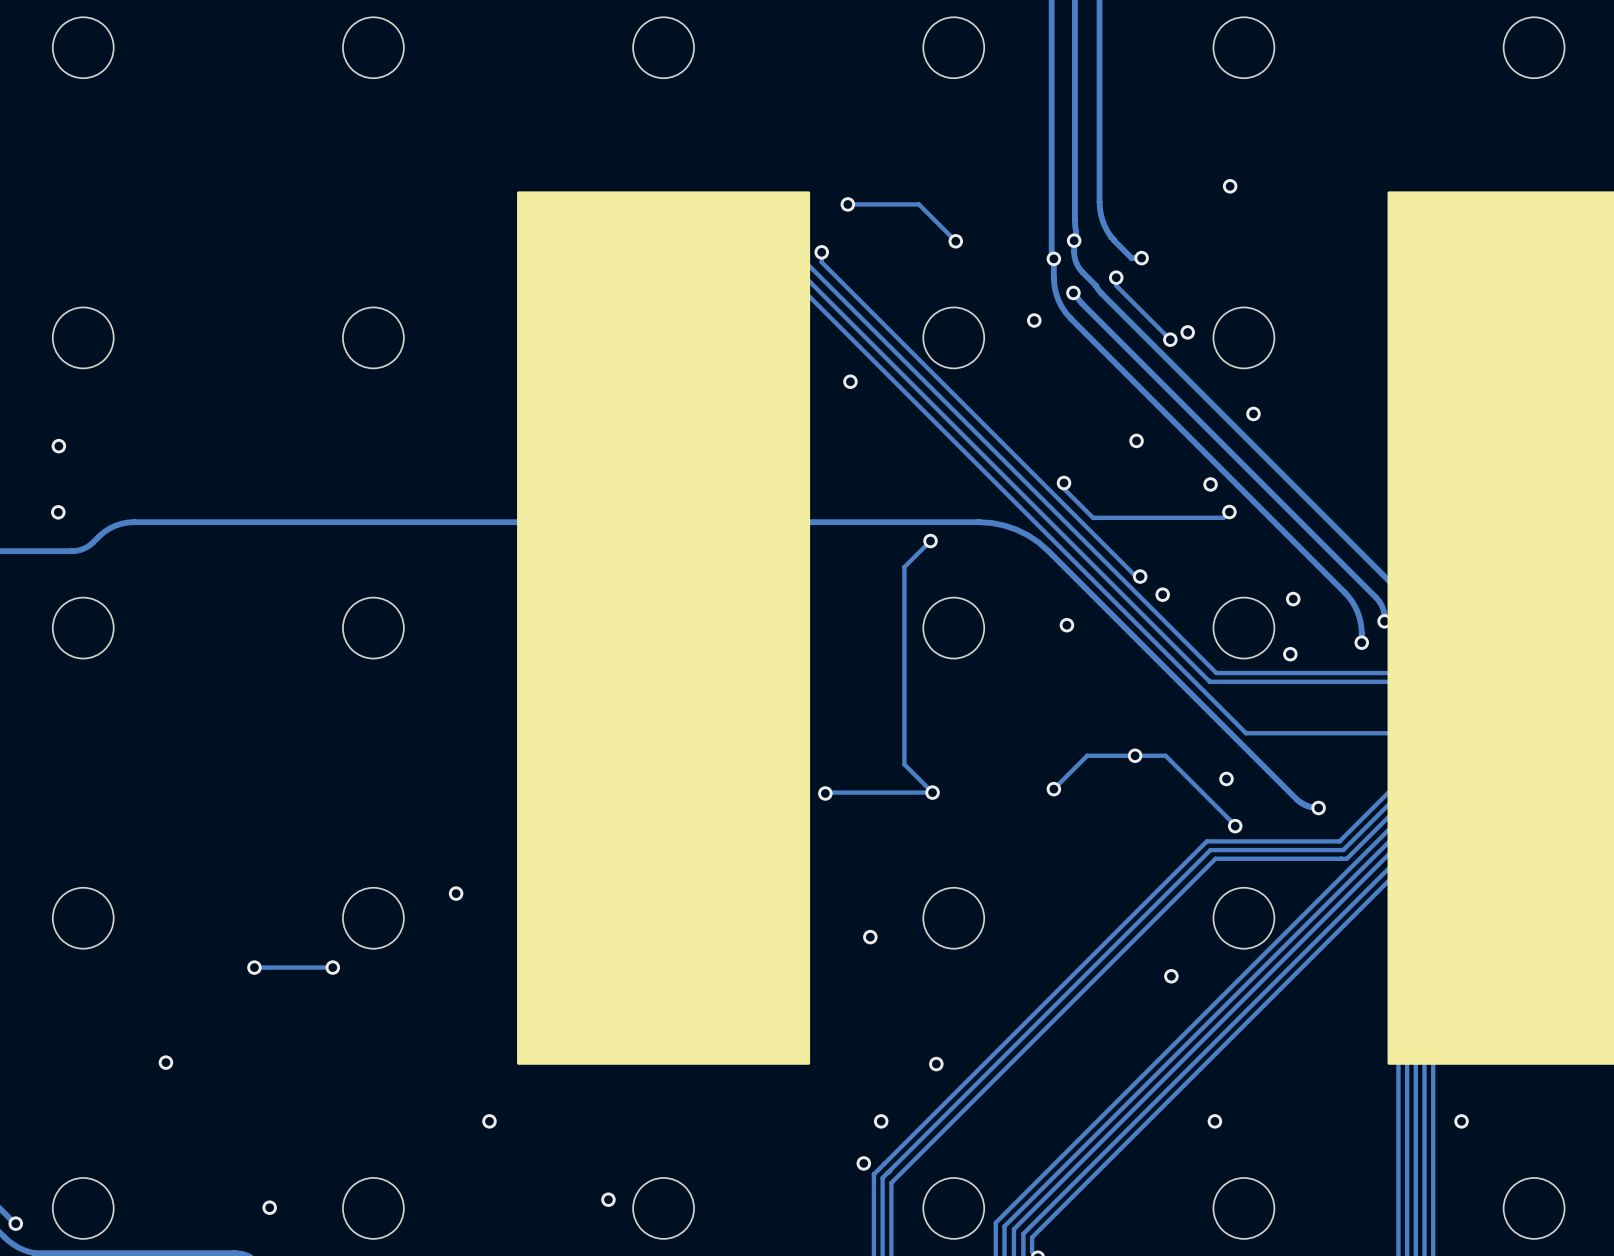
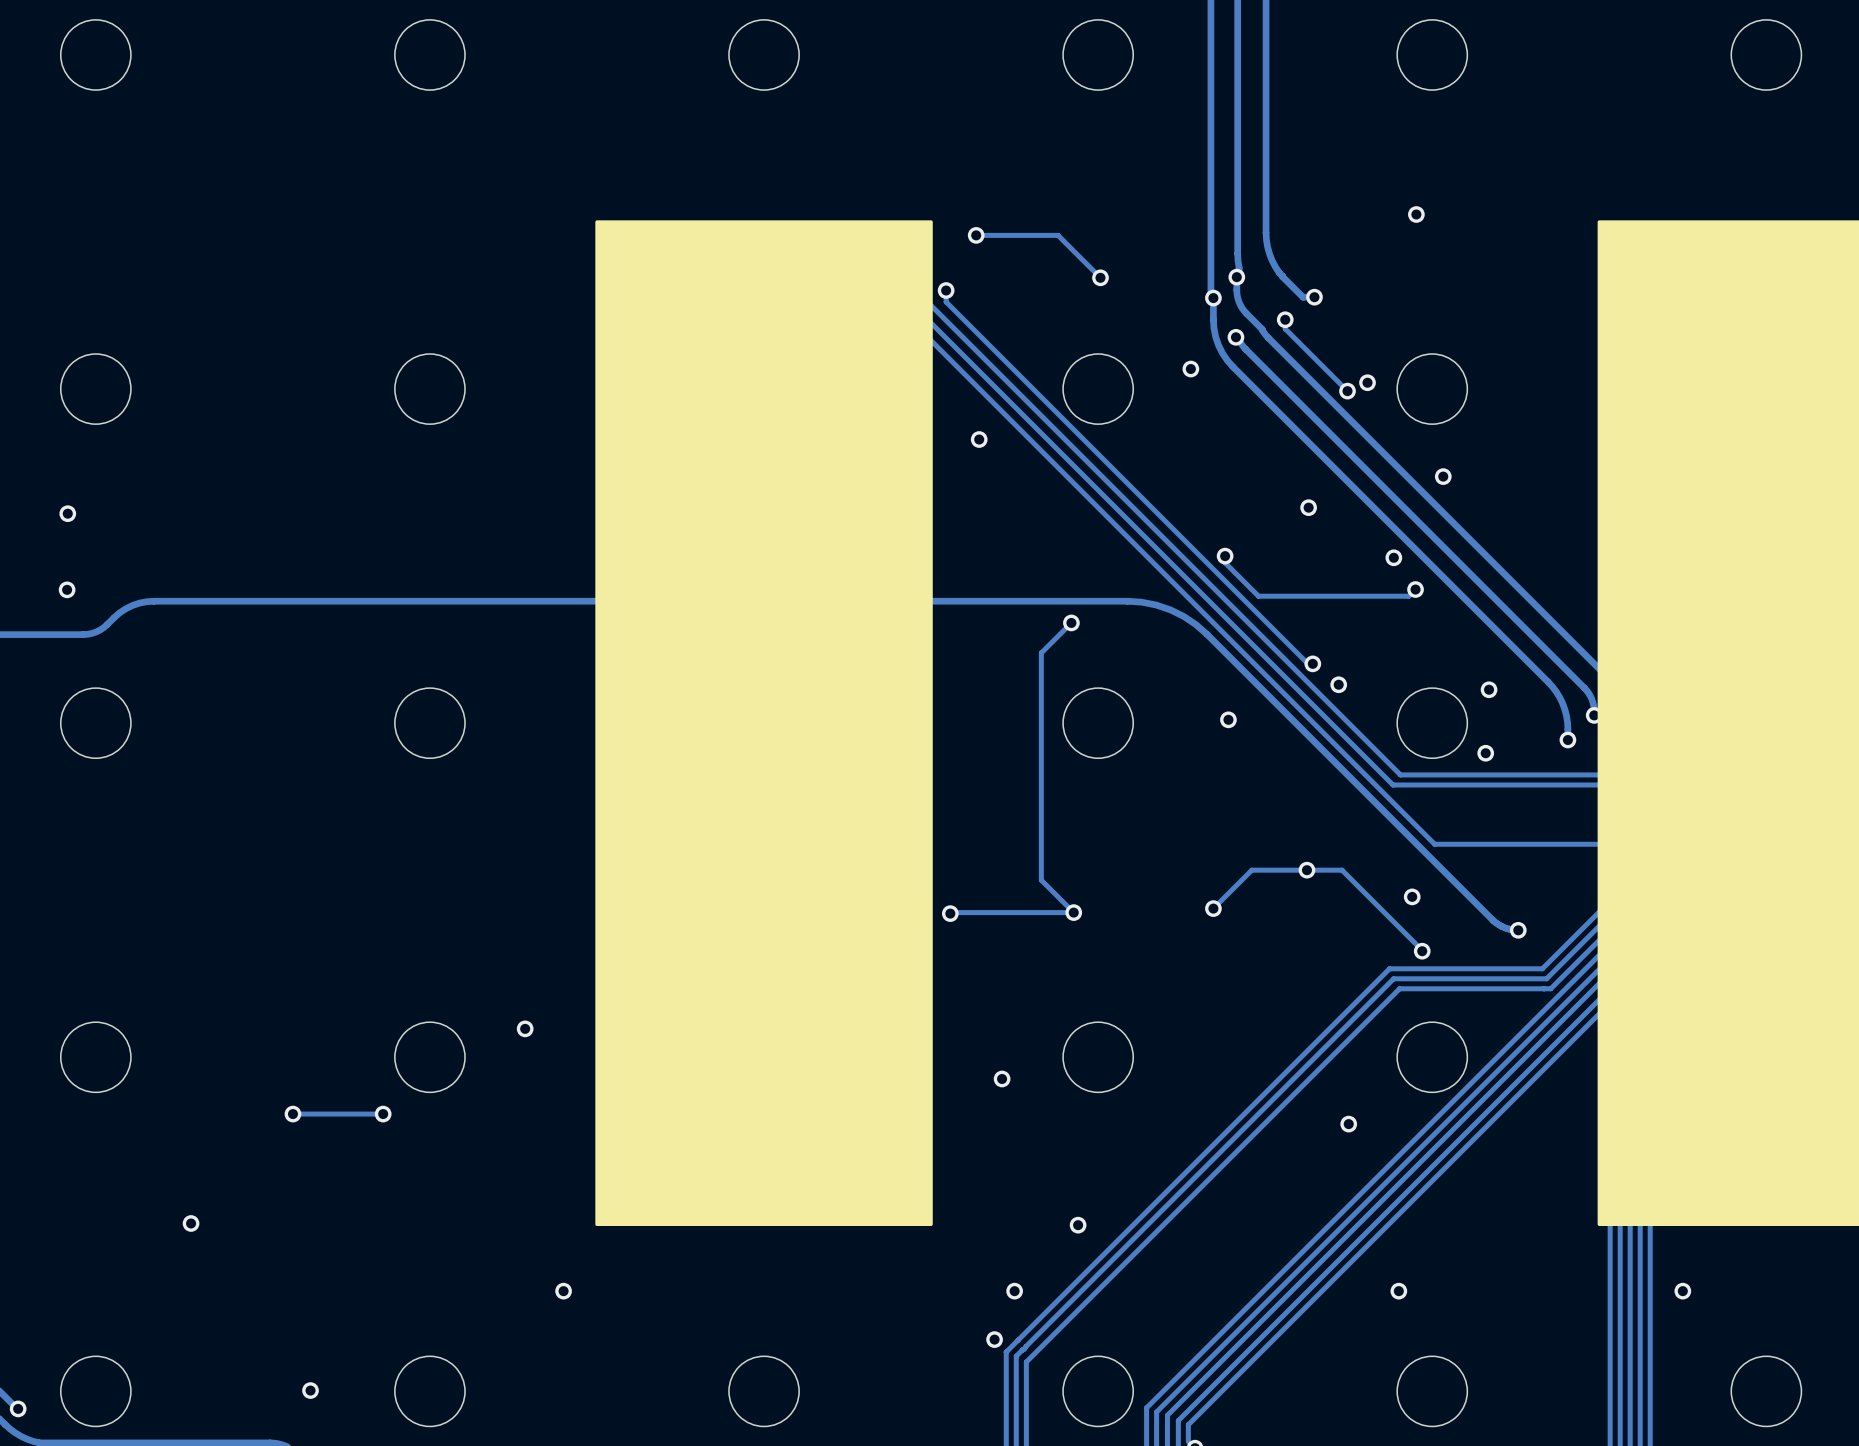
via: (608, 1199) -> none

